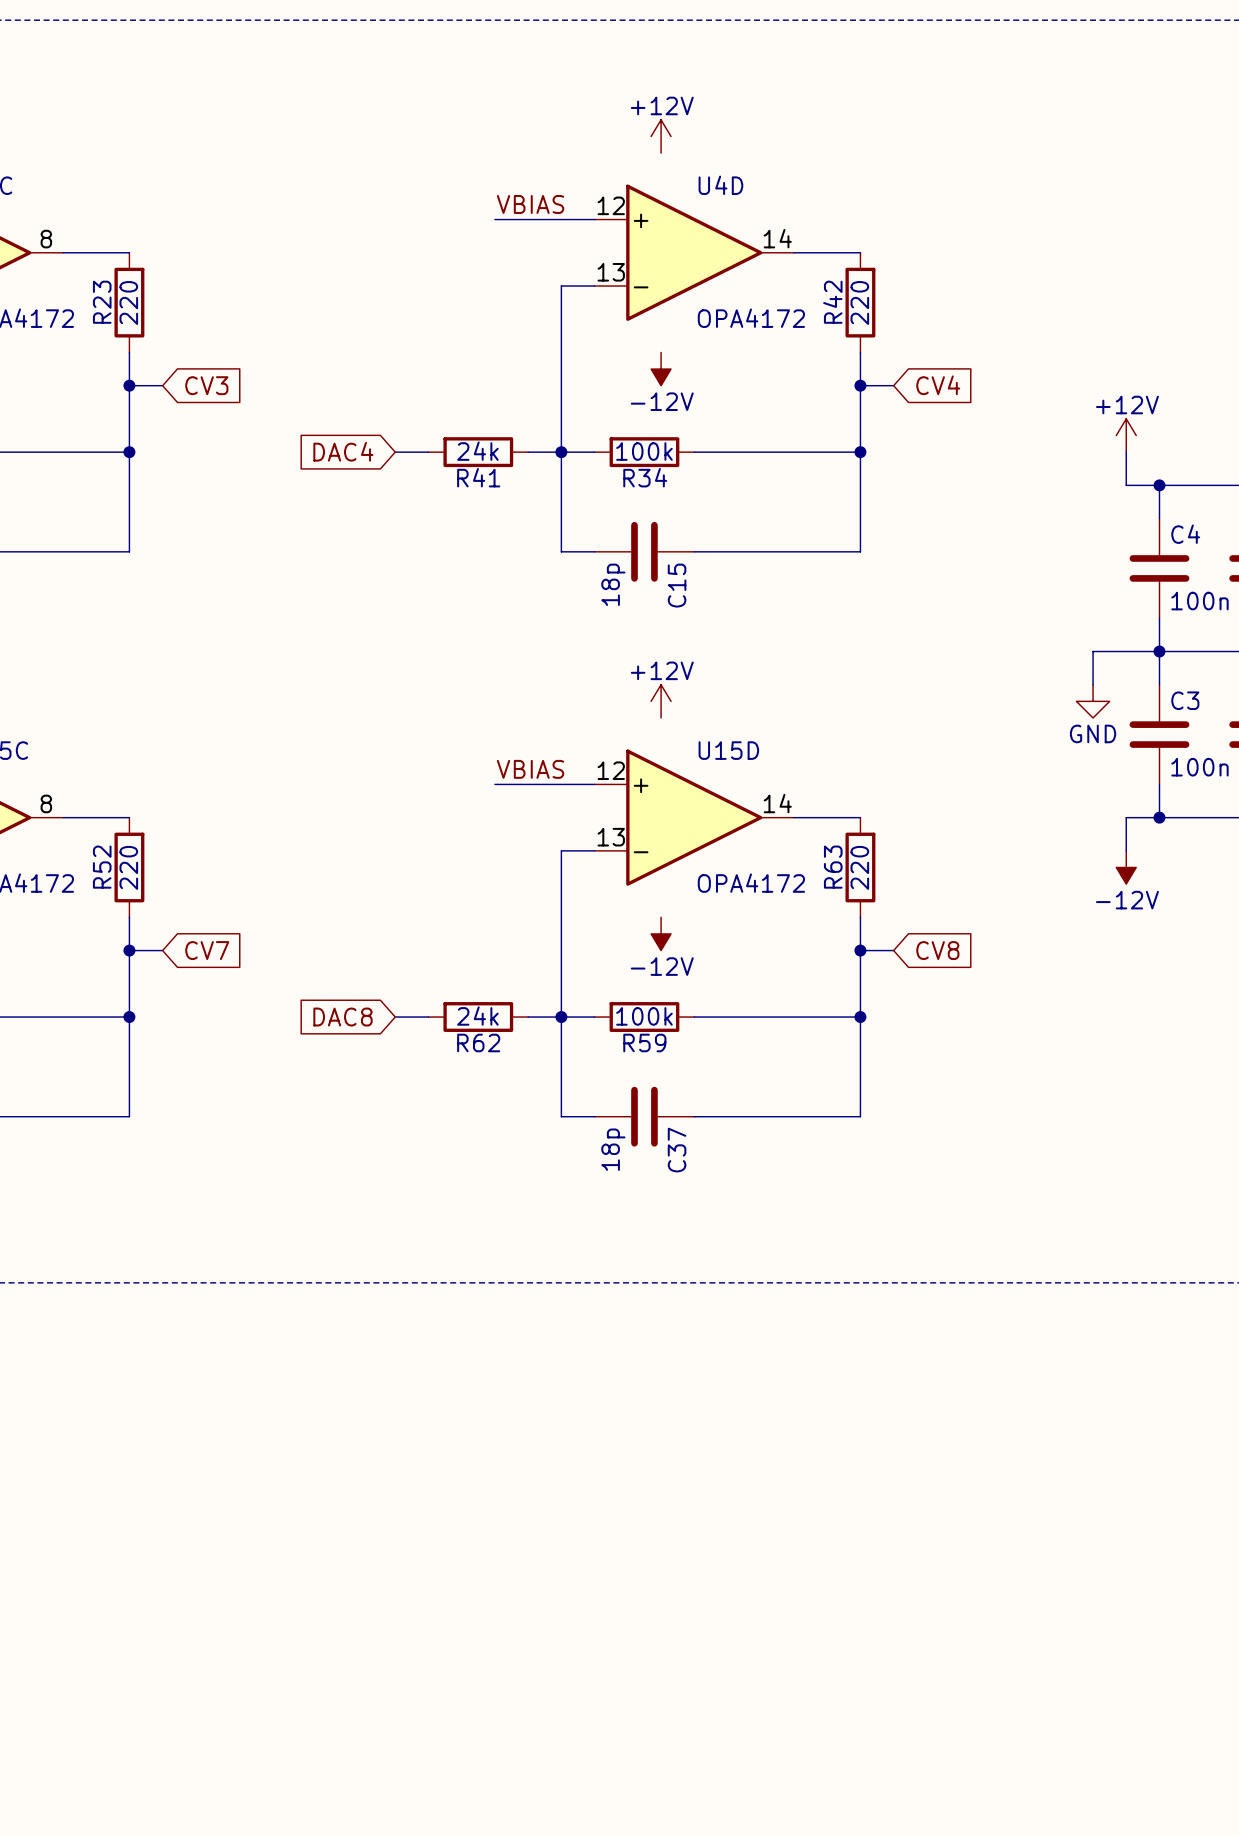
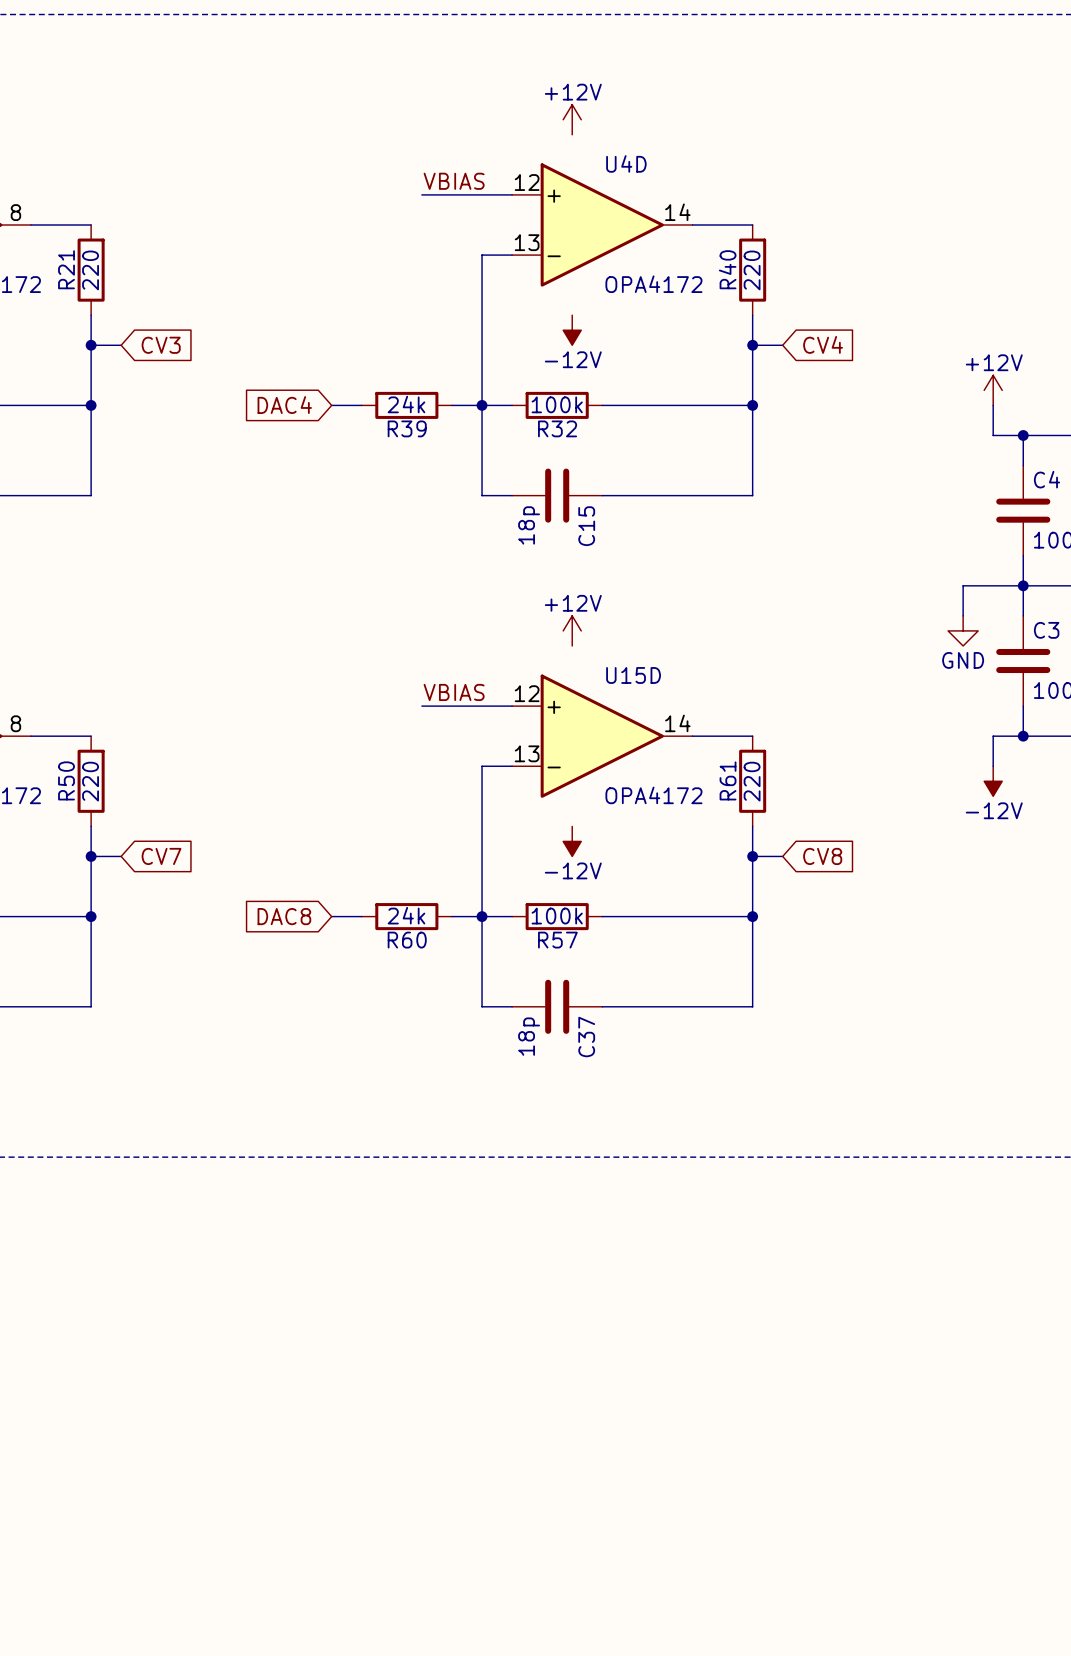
R23 name: R23 (102, 302) -> R21 (66, 269)
R42 name: R42 (832, 302) -> R40 (727, 269)
R41 name: R41 (478, 477) -> R39 (407, 428)
R34 name: R34 (645, 477) -> R32 (557, 428)
R52 name: R52 (102, 867) -> R50 (66, 780)
R63 name: R63 (833, 867) -> R61 (728, 780)
R62 name: R62 (478, 1042) -> R60 (407, 940)
R59 name: R59 (644, 1042) -> R57 (557, 940)

